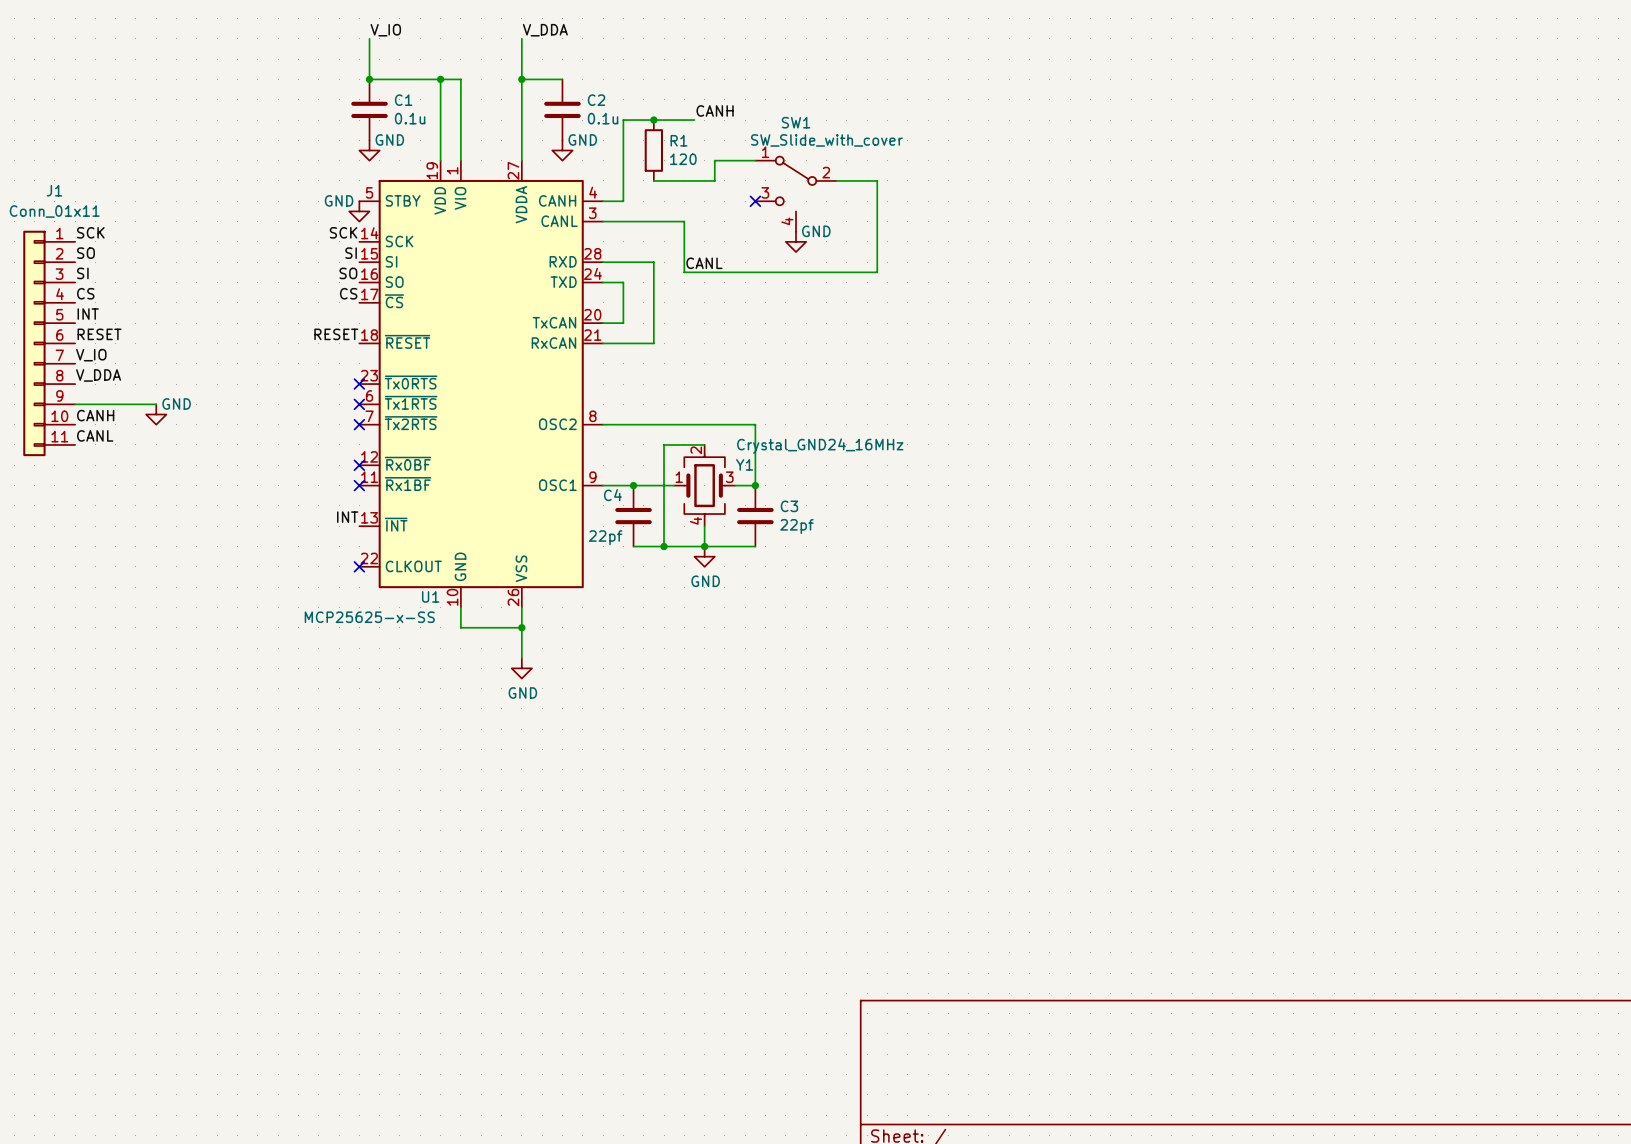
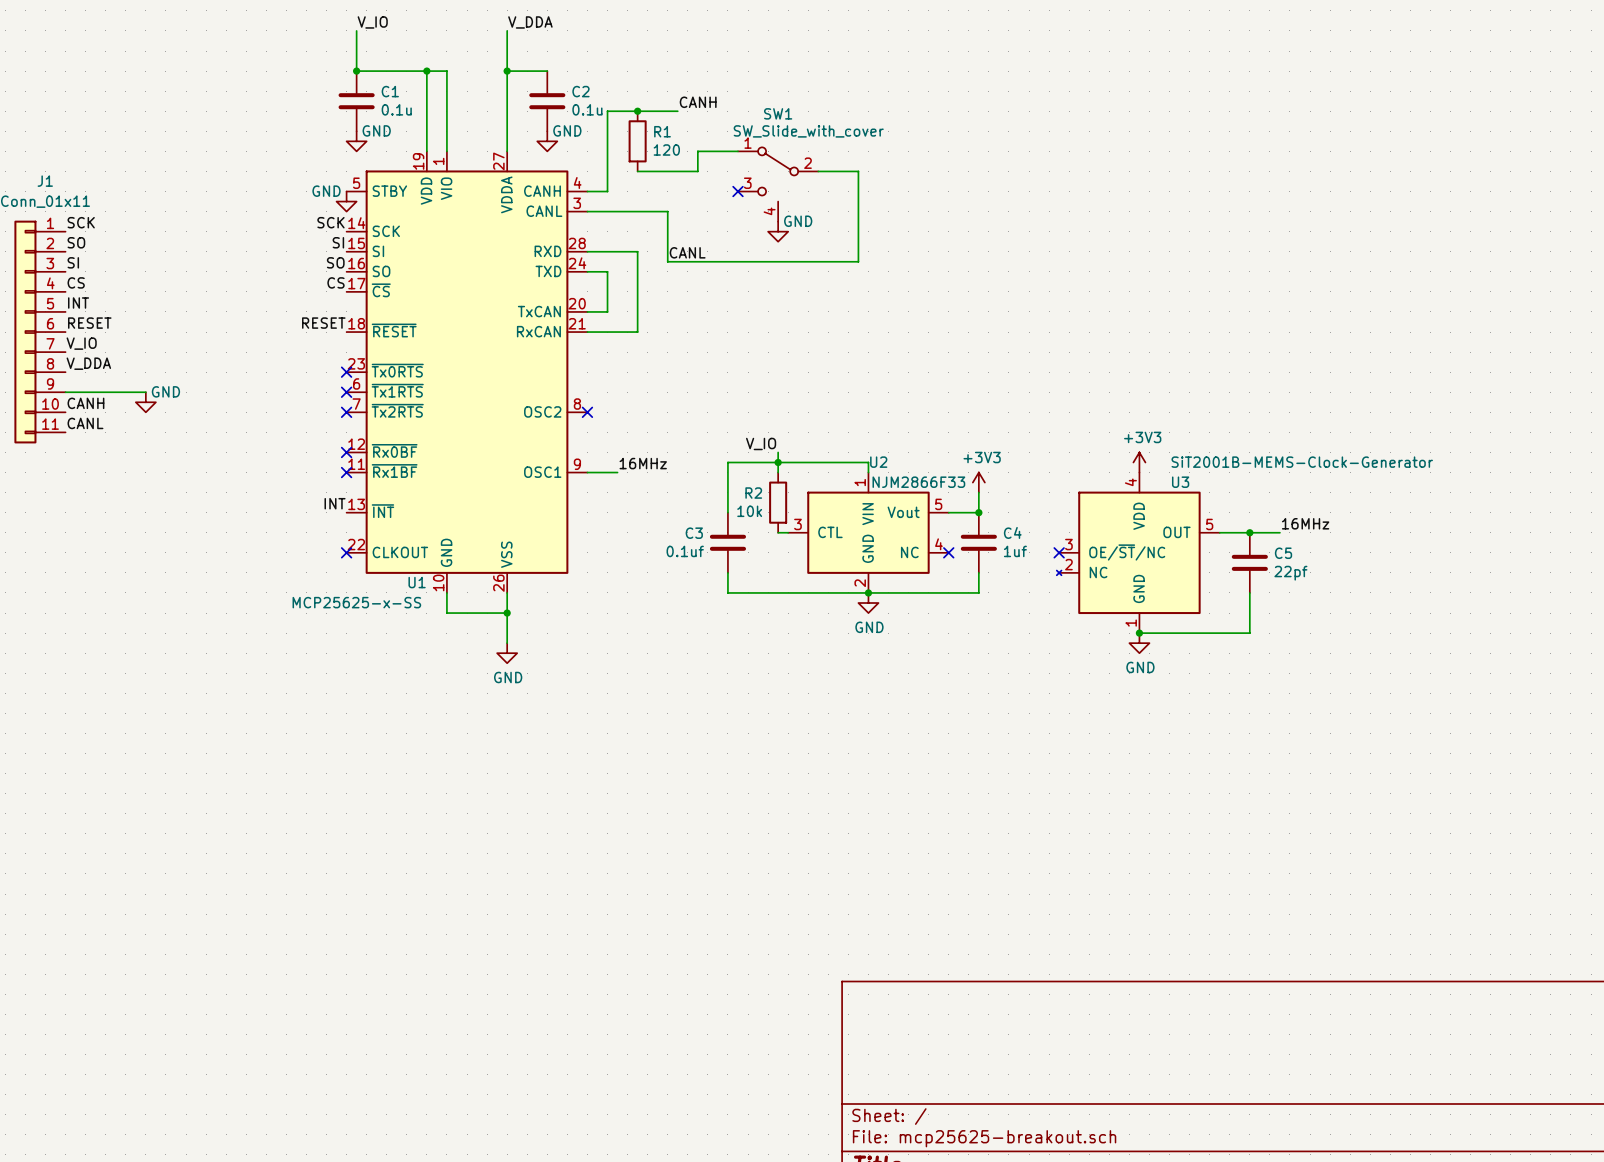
wire: (603, 424) (755, 424) (755, 485) (735, 485) -> none
no-connect mark: none -> (587, 412)
wire: (704, 444) (664, 444) (664, 546) -> none
label: none -> V_IO (761, 443)
power symbol: none -> +3V3 (1139, 462)
label: none -> 16MHz (643, 463)
wire: (633, 485) (674, 485) -> none
junction: (633, 485) -> none
Y1: Crystal_GND24_16MHz (704, 485) -> none
junction position: (755, 485) -> (778, 462)
wire: none -> (868, 472) (868, 462) (727, 462) (727, 512)
C4 name position: C4 (612, 495) -> C4 (1012, 532)
power symbol: none -> +3V3 (978, 482)
wire: none -> (978, 492) (978, 512) (948, 512)
C3 name position: C3 (789, 506) -> C3 (694, 533)
C4 position: (633, 516) -> (978, 542)
C3 position: (755, 516) -> (727, 542)
R2: none -> 10k (778, 502)
wire: (704, 526) (704, 546) -> (778, 452) (778, 472)
C3 value: 22pf (796, 526) -> 0.1uf (685, 551)
junction: none -> (978, 512)
C4 value: 22pf (605, 537) -> 1uf (1015, 551)
label: none -> 16MHz (1305, 523)
wire: (633, 546) (755, 546) -> none
junction: (664, 546) -> none
junction: (704, 546) -> none
wire: none -> (778, 532) (788, 532)
U2: none -> NJM2866F33 (868, 532)
wire: none -> (1219, 532) (1279, 532)
junction: none -> (1249, 532)
power symbol position: GND (704, 556) -> GND (868, 603)
no-connect mark: none -> (948, 552)
no-connect mark: none -> (1059, 552)
U3: none -> SiT2001B-MEMS-Clock-Generator (1138, 552)
C5: none -> 22pf (1249, 562)
wire: none -> (727, 572) (727, 592) (978, 592) (978, 572)
junction: none -> (868, 592)
wire: none -> (1249, 592) (1249, 633) (1139, 633)
junction: none -> (1139, 633)
power symbol: none -> GND (1139, 643)

